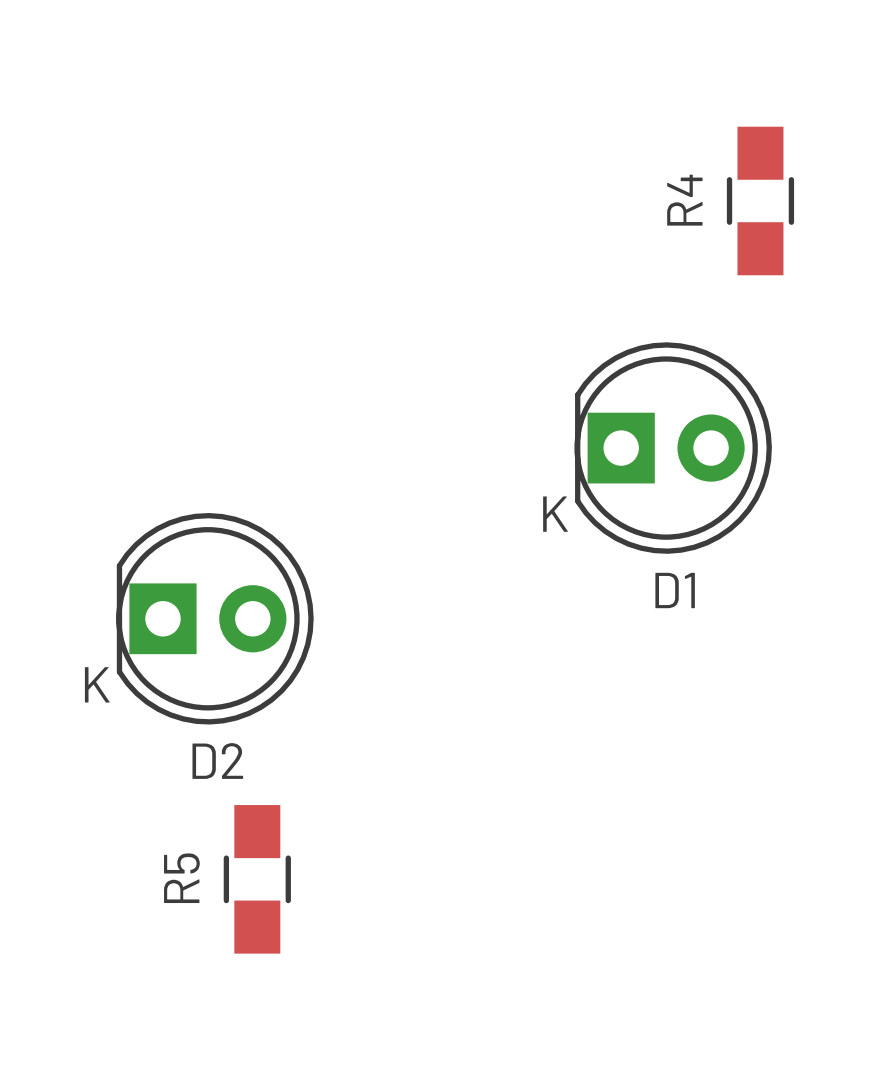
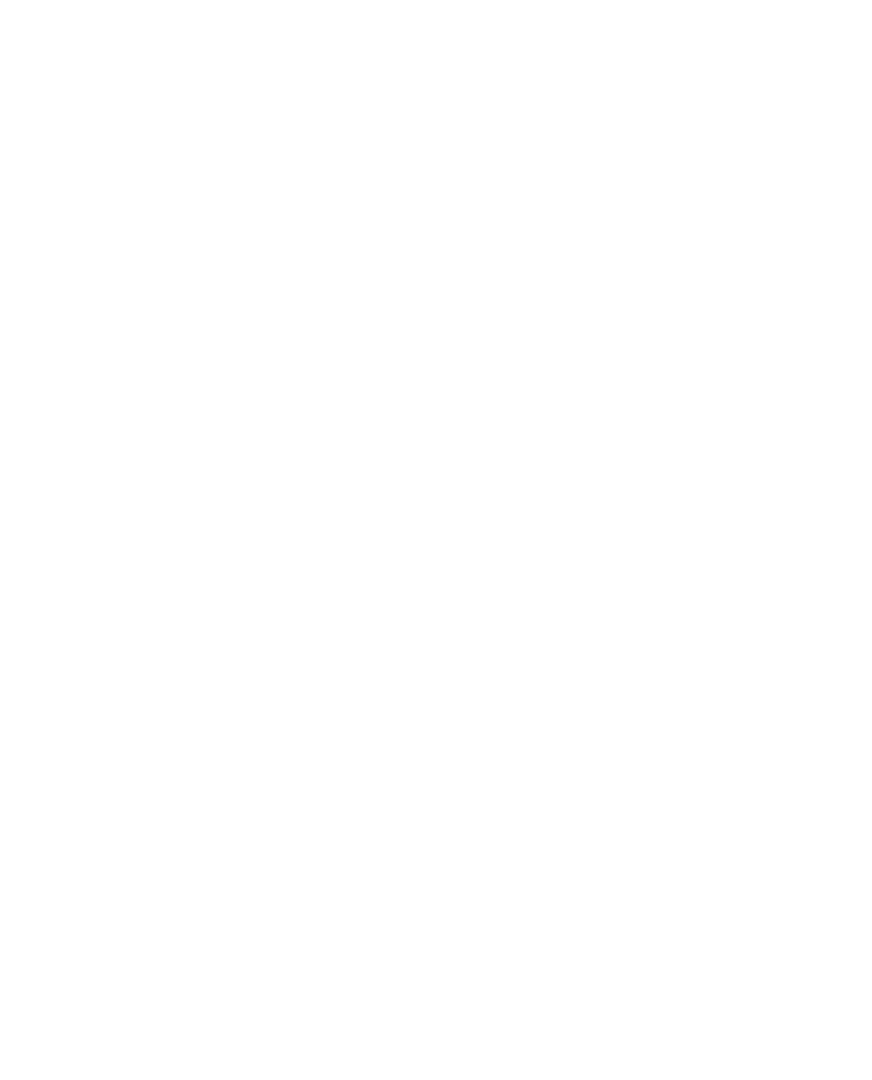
R4: (760, 200) -> none
D1: (673, 448) -> none
D2: (214, 618) -> none
R5: (257, 879) -> none

